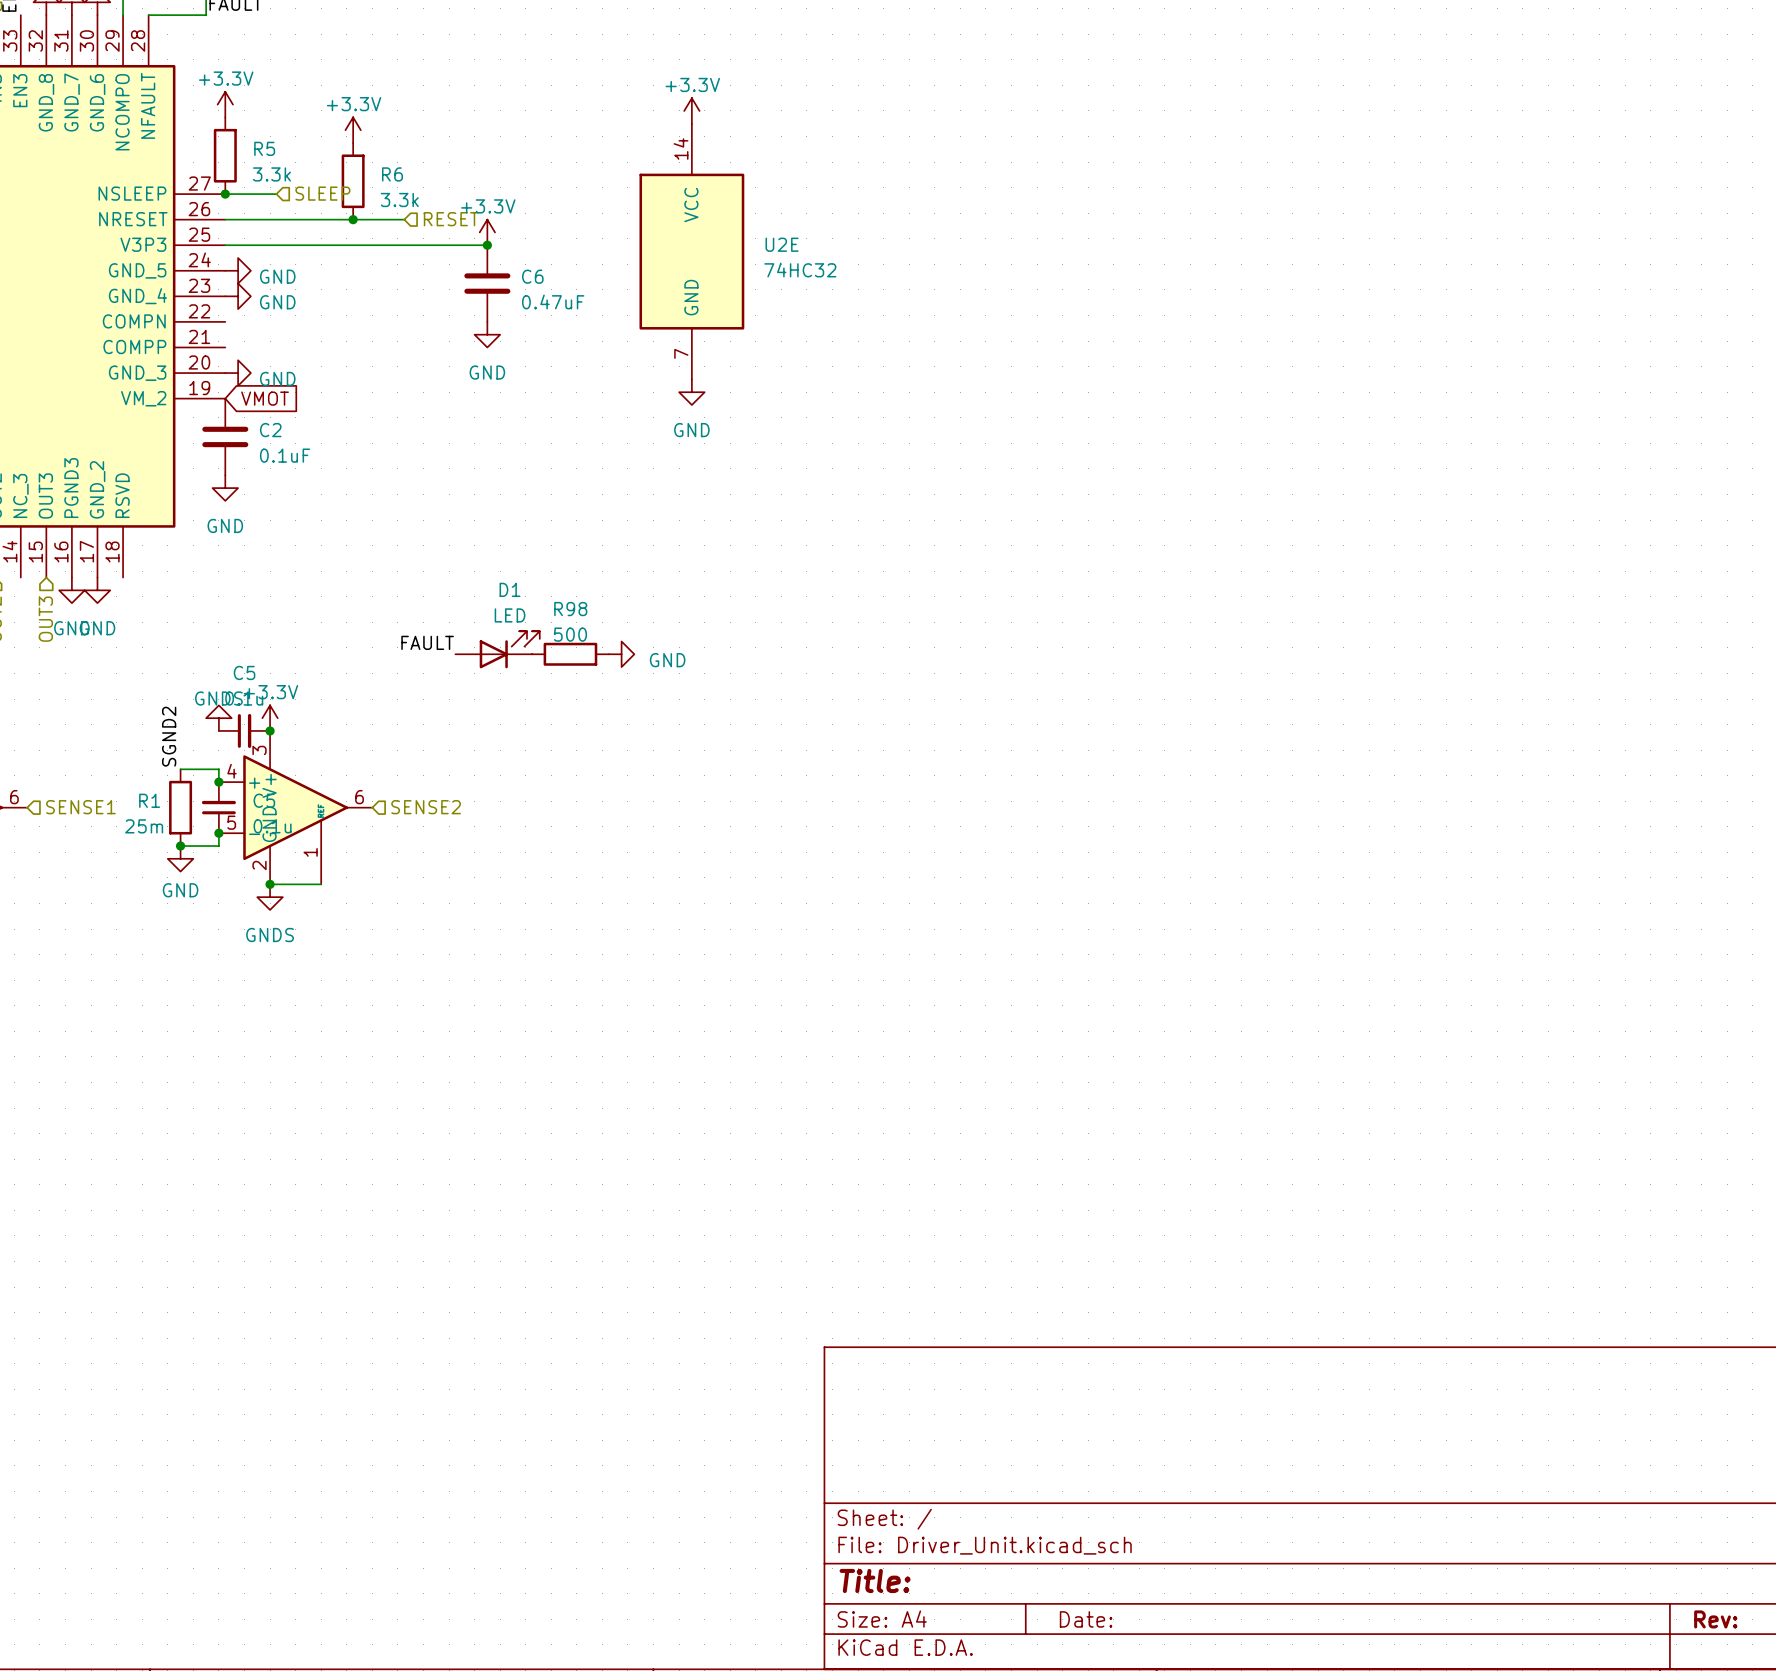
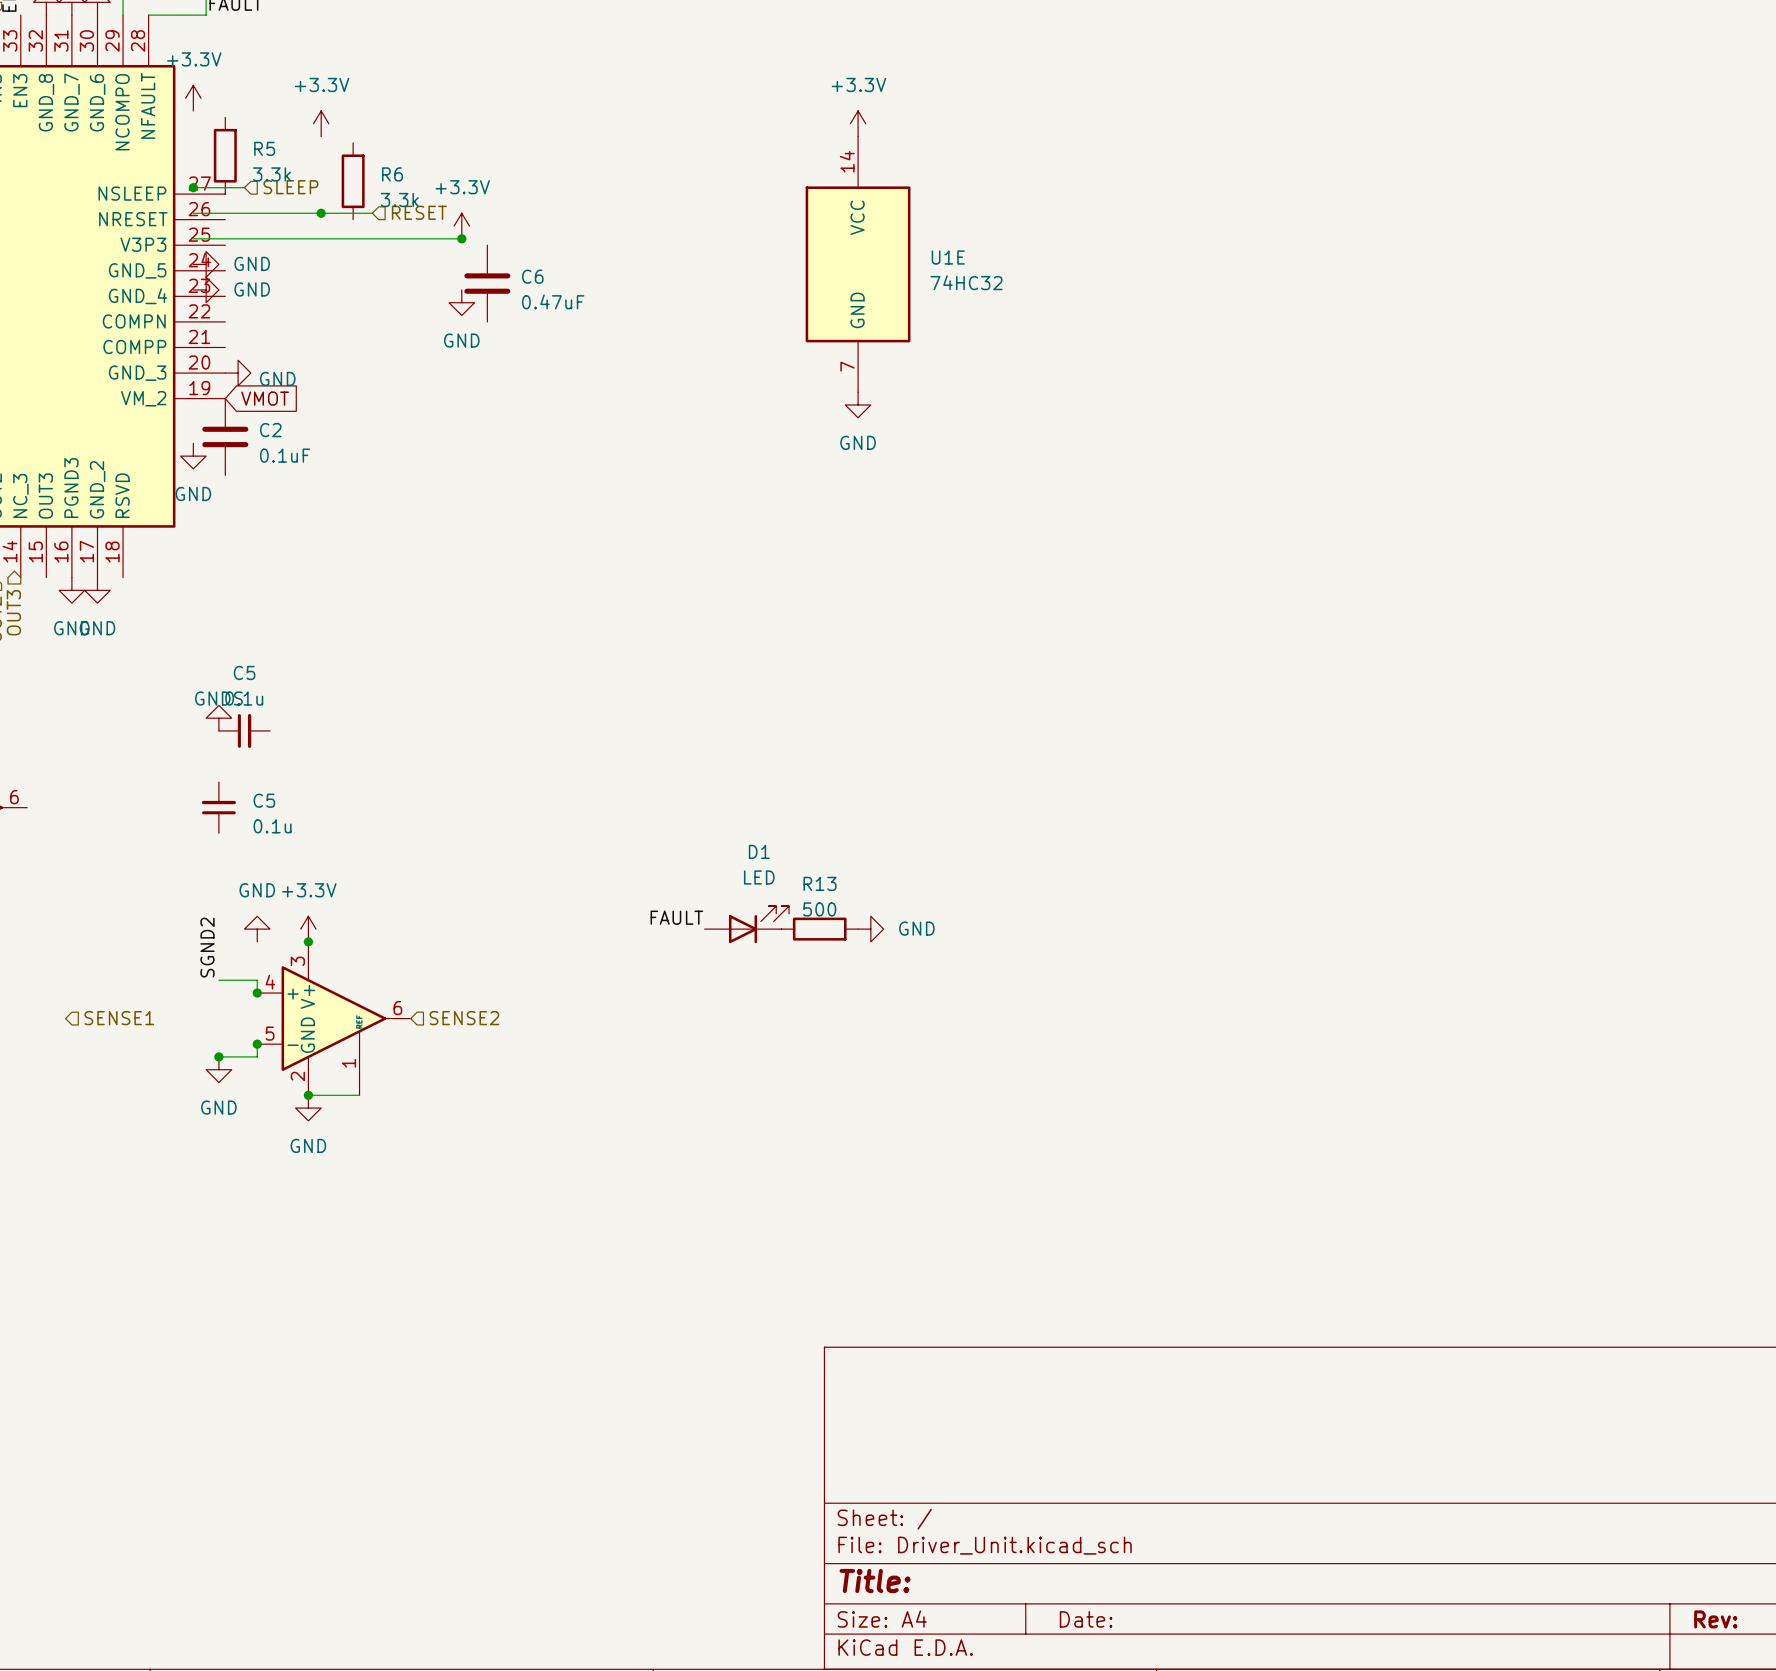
power symbol text position: +3.3V (226, 78) -> +3.3V (194, 59)
power symbol position: +3.3V (225, 104) -> +3.3V (193, 98)
power symbol text position: +3.3V (354, 104) -> +3.3V (322, 84)
power symbol: +3.3V (691, 110) -> none
power symbol: none -> +3.3V (858, 123)
power symbol position: +3.3V (353, 130) -> +3.3V (321, 123)
hierarchical label position: SLEEP (322, 193) -> SLEEP (290, 187)
wire: (225, 194) (276, 194) -> (193, 187) (244, 187)
junction position: (225, 194) -> (193, 187)
power symbol text position: +3.3V (488, 206) -> +3.3V (462, 187)
wire: (225, 219) (404, 219) -> (193, 213) (372, 213)
junction position: (353, 219) -> (321, 213)
hierarchical label position: RESET (451, 219) -> RESET (419, 212)
power symbol position: +3.3V (487, 232) -> +3.3V (461, 226)
wire: none -> (193, 238) (461, 238)
wire: (225, 245) (487, 245) -> none
junction position: (487, 245) -> (461, 238)
U2E: 74HC32 (691, 251) -> none
power symbol: none -> GND (206, 264)
U1E: none -> 74HC32 (858, 264)
power symbol: GND (238, 270) -> none
power symbol: none -> GND (206, 289)
power symbol: GND (238, 296) -> none
power symbol position: GND (487, 334) -> GND (461, 302)
power symbol: GND (691, 392) -> none
power symbol: none -> GND (858, 405)
power symbol position: GND (225, 488) -> GND (193, 456)
D1 name position: D1 (510, 589) -> D1 (759, 851)
D1 value position: LED (510, 615) -> LED (759, 877)
hierarchical label position: OUT3 (45, 619) -> OUT3 (13, 612)
label: FAULT (427, 642) -> none
D1 position: (497, 649) -> (746, 924)
R98: 500 (570, 654) -> none
power symbol: GND (621, 654) -> none
power symbol: +3.3V (270, 718) -> none
junction: (270, 730) -> none
label: SGND2 (169, 736) -> none
wire: (180, 769) (218, 769) (218, 782) -> (218, 980) (257, 980) (257, 993)
junction: (218, 782) -> none
hierarchical label position: SENSE1 (80, 807) -> SENSE1 (119, 1018)
R1: 25m (180, 807) -> none
part position: (295, 807) -> (333, 1018)
hierarchical label position: SENSE2 (426, 807) -> SENSE2 (464, 1018)
wire: (218, 833) (218, 846) (180, 846) -> (257, 1044) (257, 1056) (218, 1056)
junction: (218, 833) -> none
junction: (180, 846) -> none
power symbol rotation: 0° (180, 858) -> 180° (257, 929)
power symbol position: GND (180, 858) -> GND (257, 929)
wire: (270, 884) (321, 884) -> (308, 1095) (359, 1095)
junction: (270, 884) -> none
power symbol: GNDS (270, 897) -> none
label: none -> FAULT (676, 917)
power symbol: none -> +3.3V (308, 929)
R13: none -> 500 (819, 929)
power symbol: none -> GND (870, 929)
junction: none -> (308, 941)
label: none -> SGND2 (207, 947)
junction: none -> (257, 993)
junction: none -> (257, 1044)
junction: none -> (218, 1056)
power symbol: none -> GND (218, 1069)
junction: none -> (308, 1095)
power symbol: none -> GND (308, 1108)

